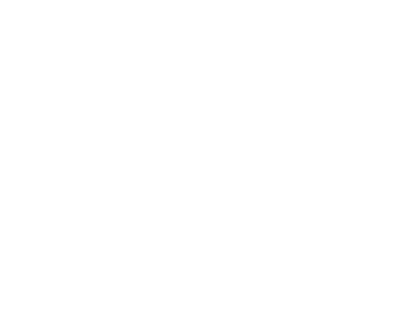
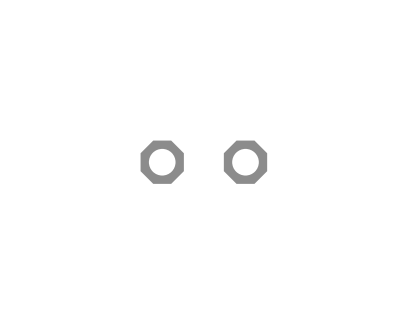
part: none -> (203, 162)

